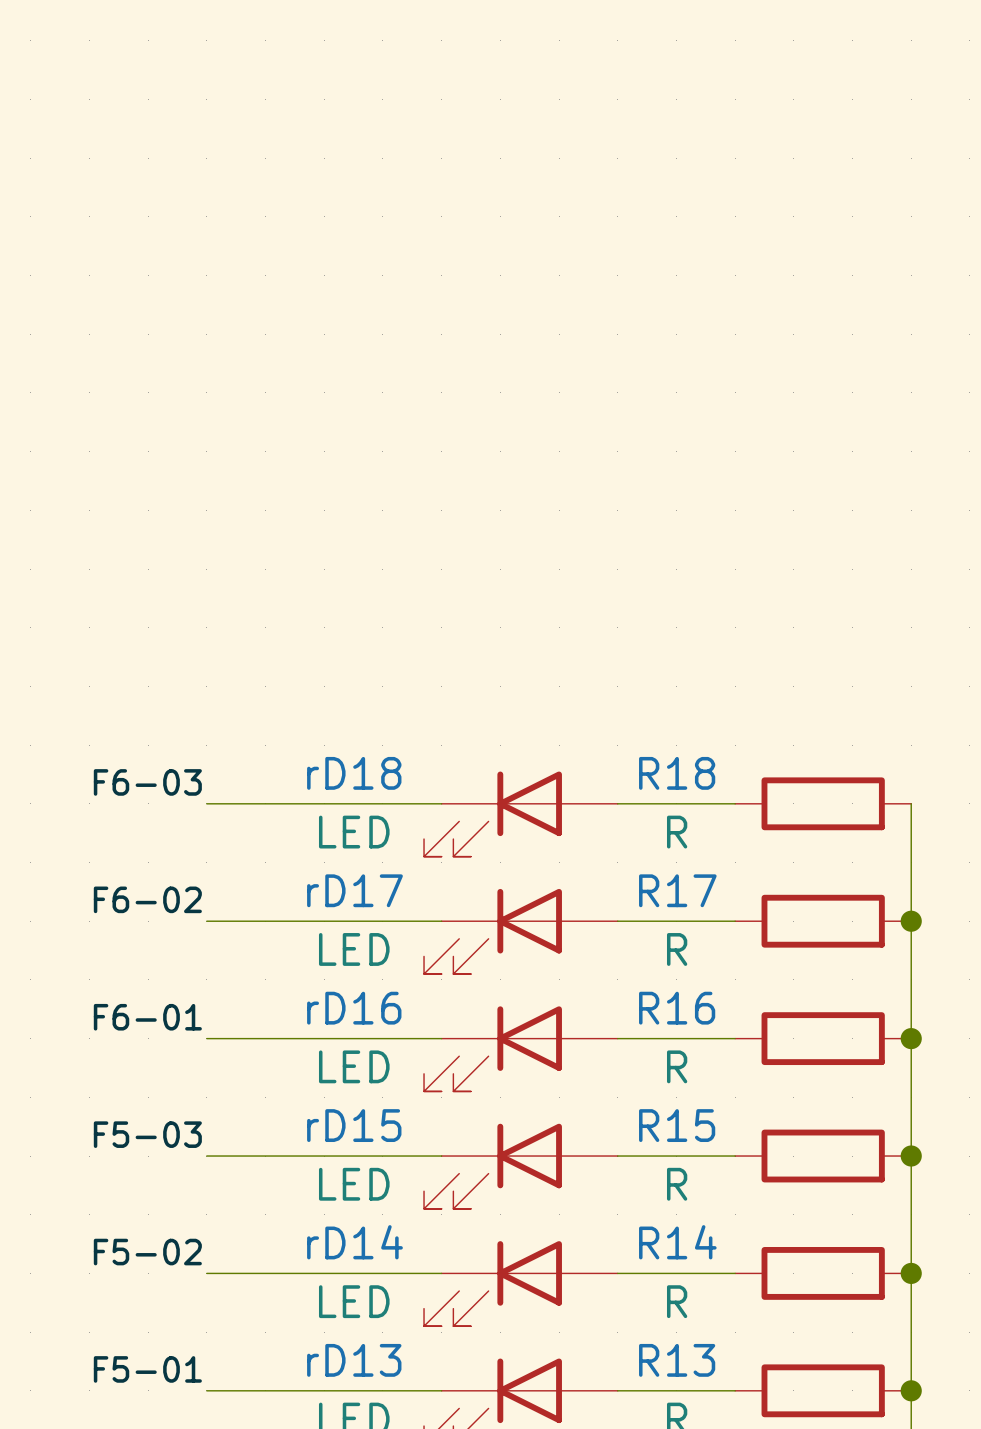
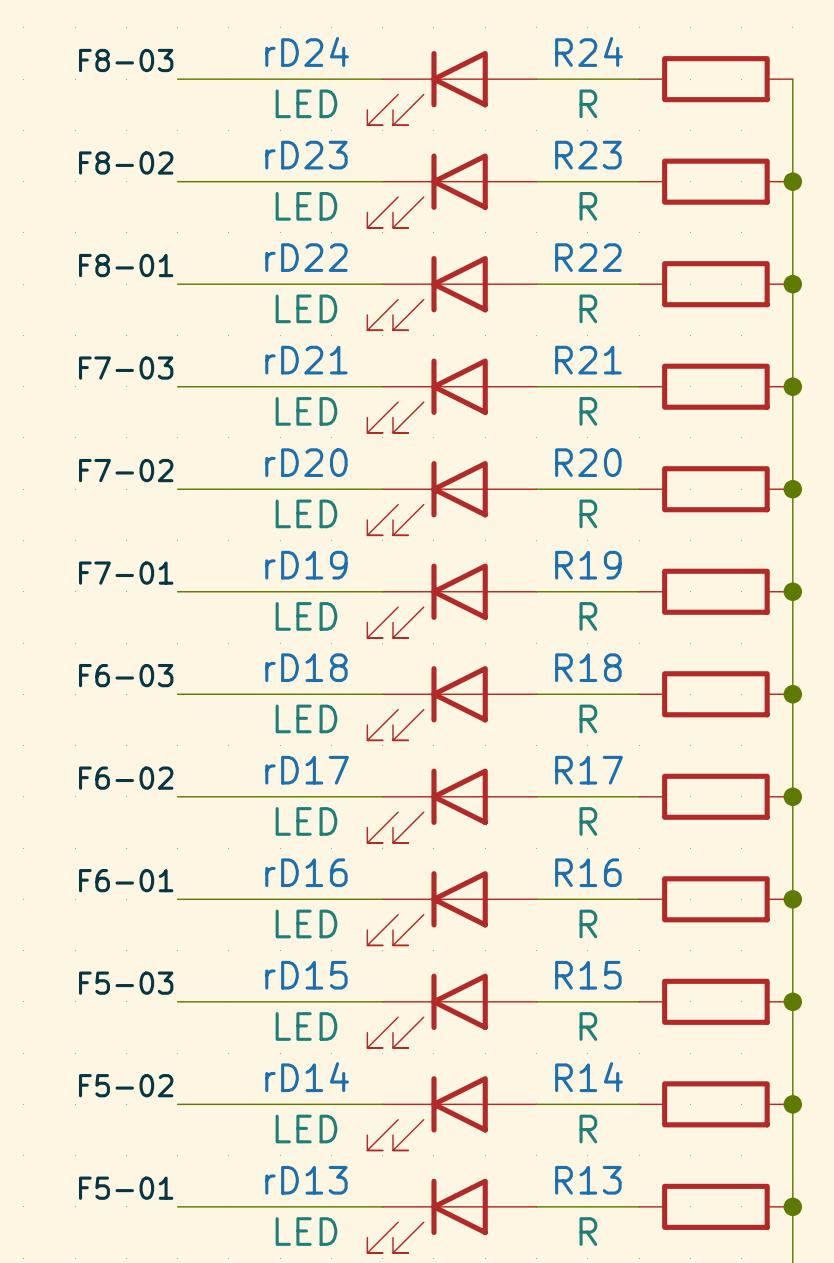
label: none -> F8-03 (126, 60)
wire: none -> (177, 79) (382, 79)
wire: none -> (536, 79) (639, 79)
R24: none -> R (715, 79)
wire: none -> (792, 79) (792, 694)
rD24: none -> LED (451, 88)
label: none -> F8-02 (126, 163)
wire: none -> (177, 181) (382, 181)
wire: none -> (536, 181) (639, 181)
R23: none -> R (715, 181)
junction: none -> (792, 181)
rD23: none -> LED (451, 190)
label: none -> F8-01 (126, 265)
wire: none -> (177, 284) (382, 284)
wire: none -> (536, 284) (639, 284)
R22: none -> R (715, 284)
junction: none -> (792, 284)
rD22: none -> LED (451, 293)
label: none -> F7-03 (126, 368)
wire: none -> (177, 386) (382, 386)
wire: none -> (536, 386) (639, 386)
R21: none -> R (715, 386)
junction: none -> (792, 386)
rD21: none -> LED (451, 395)
label: none -> F7-02 (126, 470)
wire: none -> (177, 489) (382, 489)
wire: none -> (536, 489) (639, 489)
R20: none -> R (715, 489)
junction: none -> (792, 489)
rD20: none -> LED (451, 498)
label: none -> F7-01 (126, 573)
wire: none -> (177, 591) (382, 591)
wire: none -> (536, 591) (639, 591)
R19: none -> R (715, 591)
junction: none -> (792, 591)
rD19: none -> LED (451, 600)
junction: none -> (792, 694)

